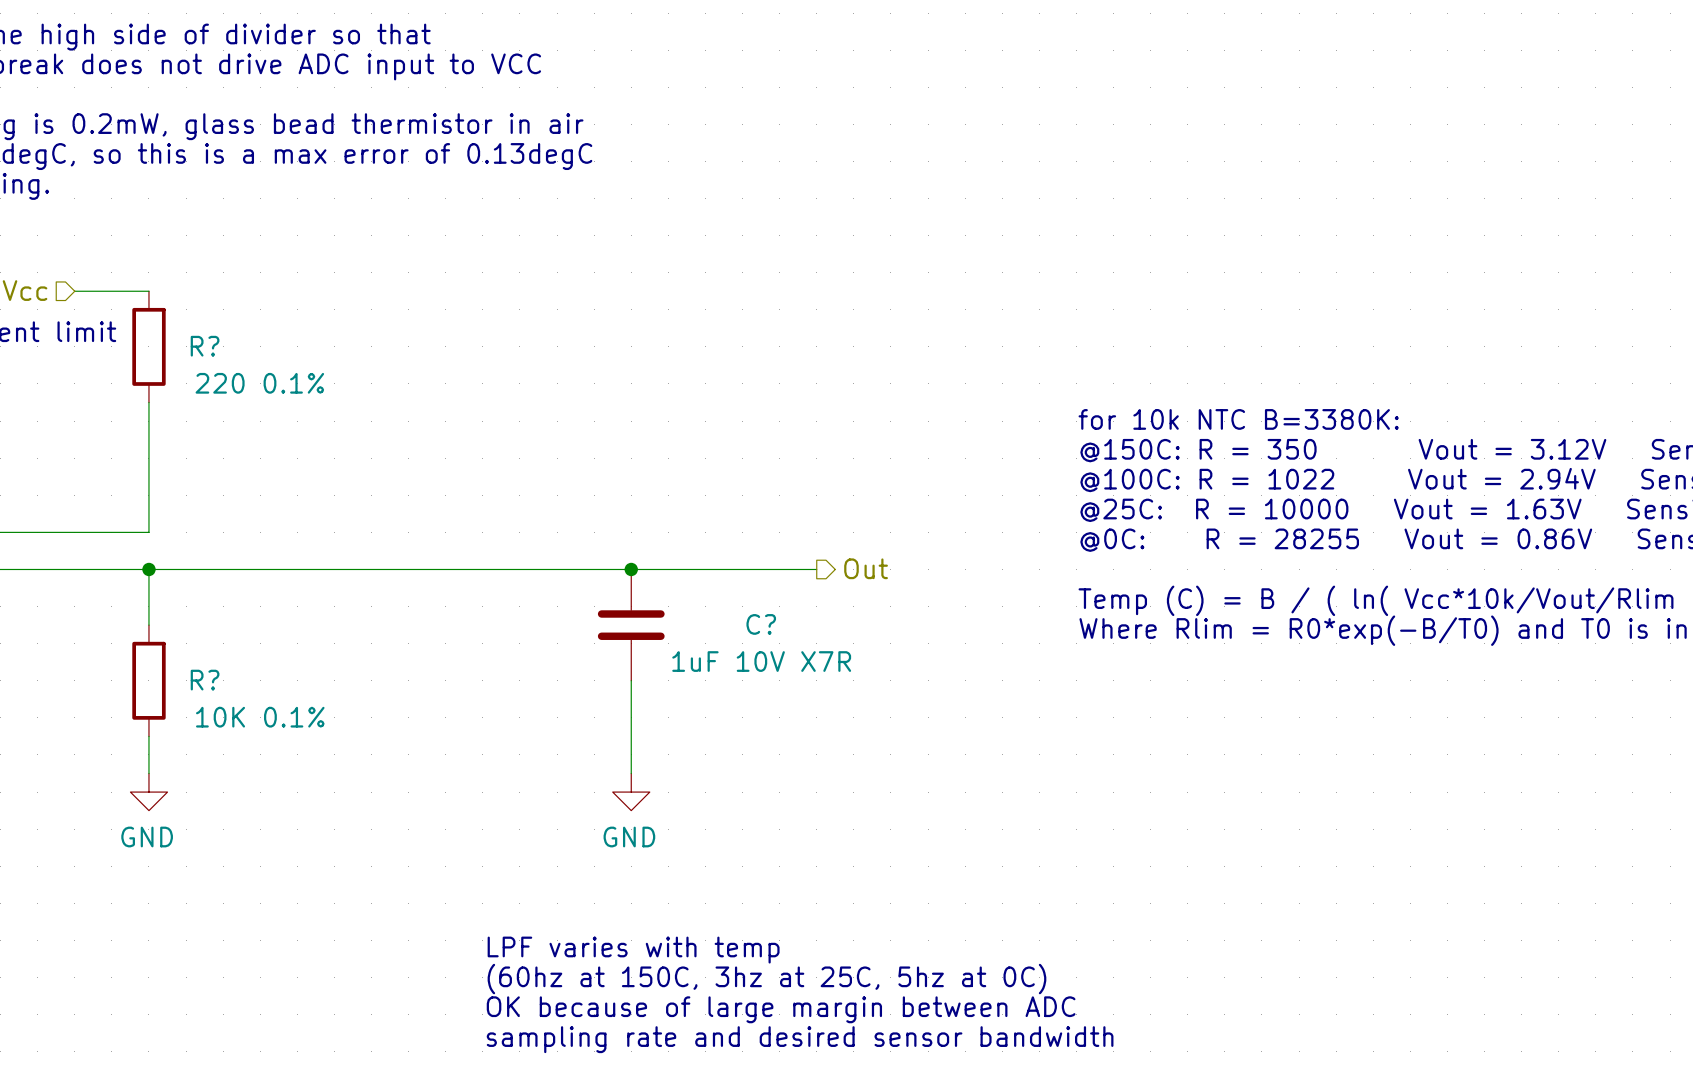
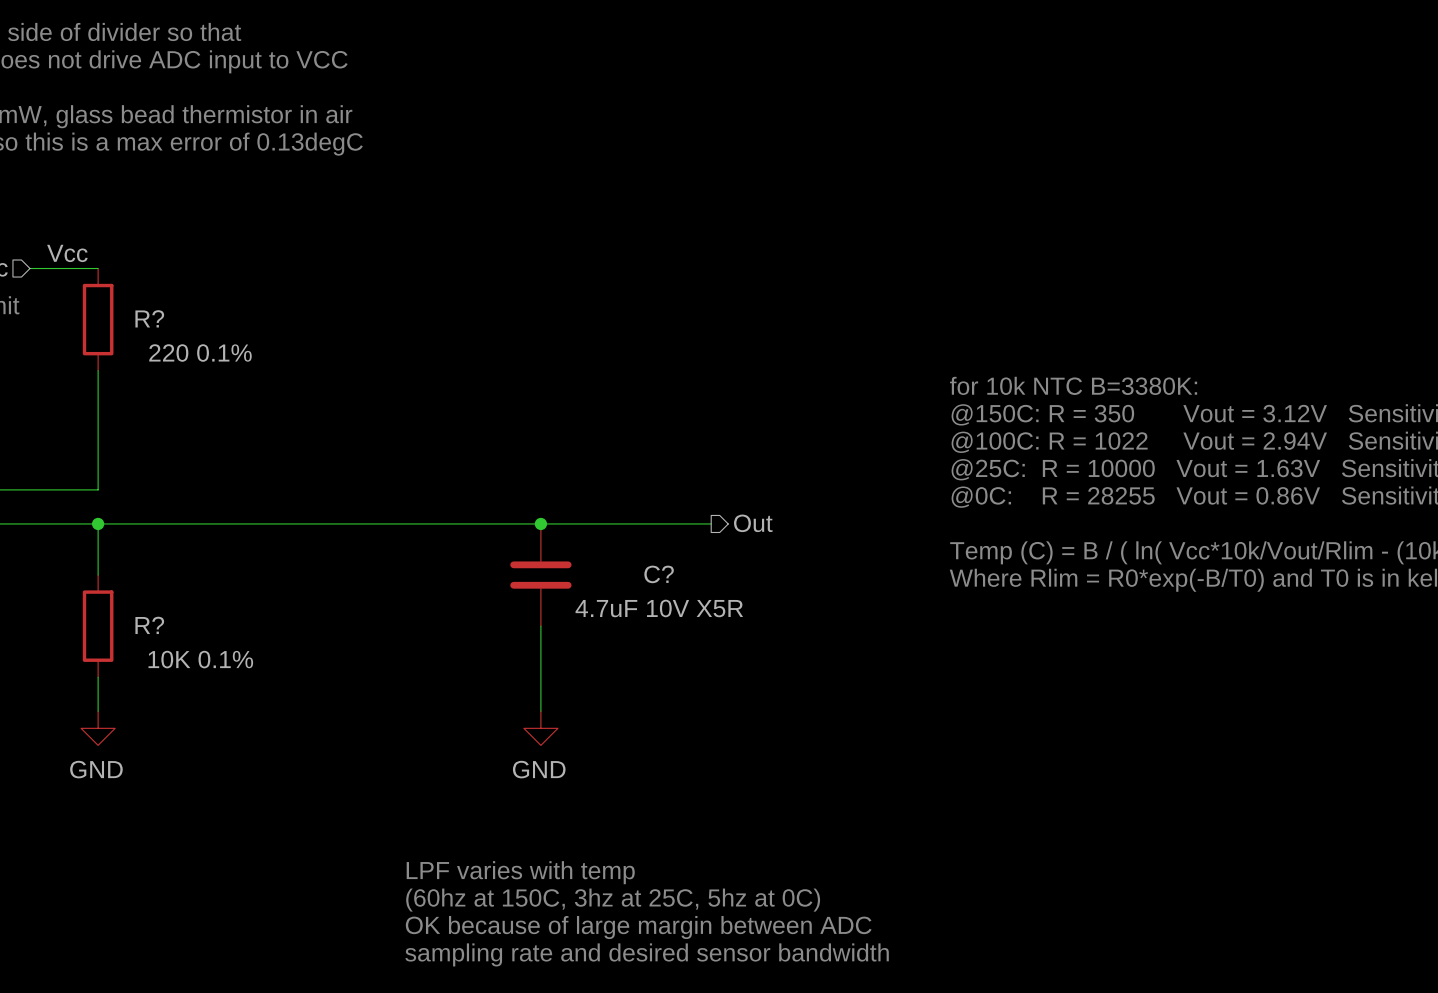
label: none -> Vcc (67, 253)
C? value: 1uF 10V X7R (761, 661) -> 4.7uF 10V X5R (659, 608)

